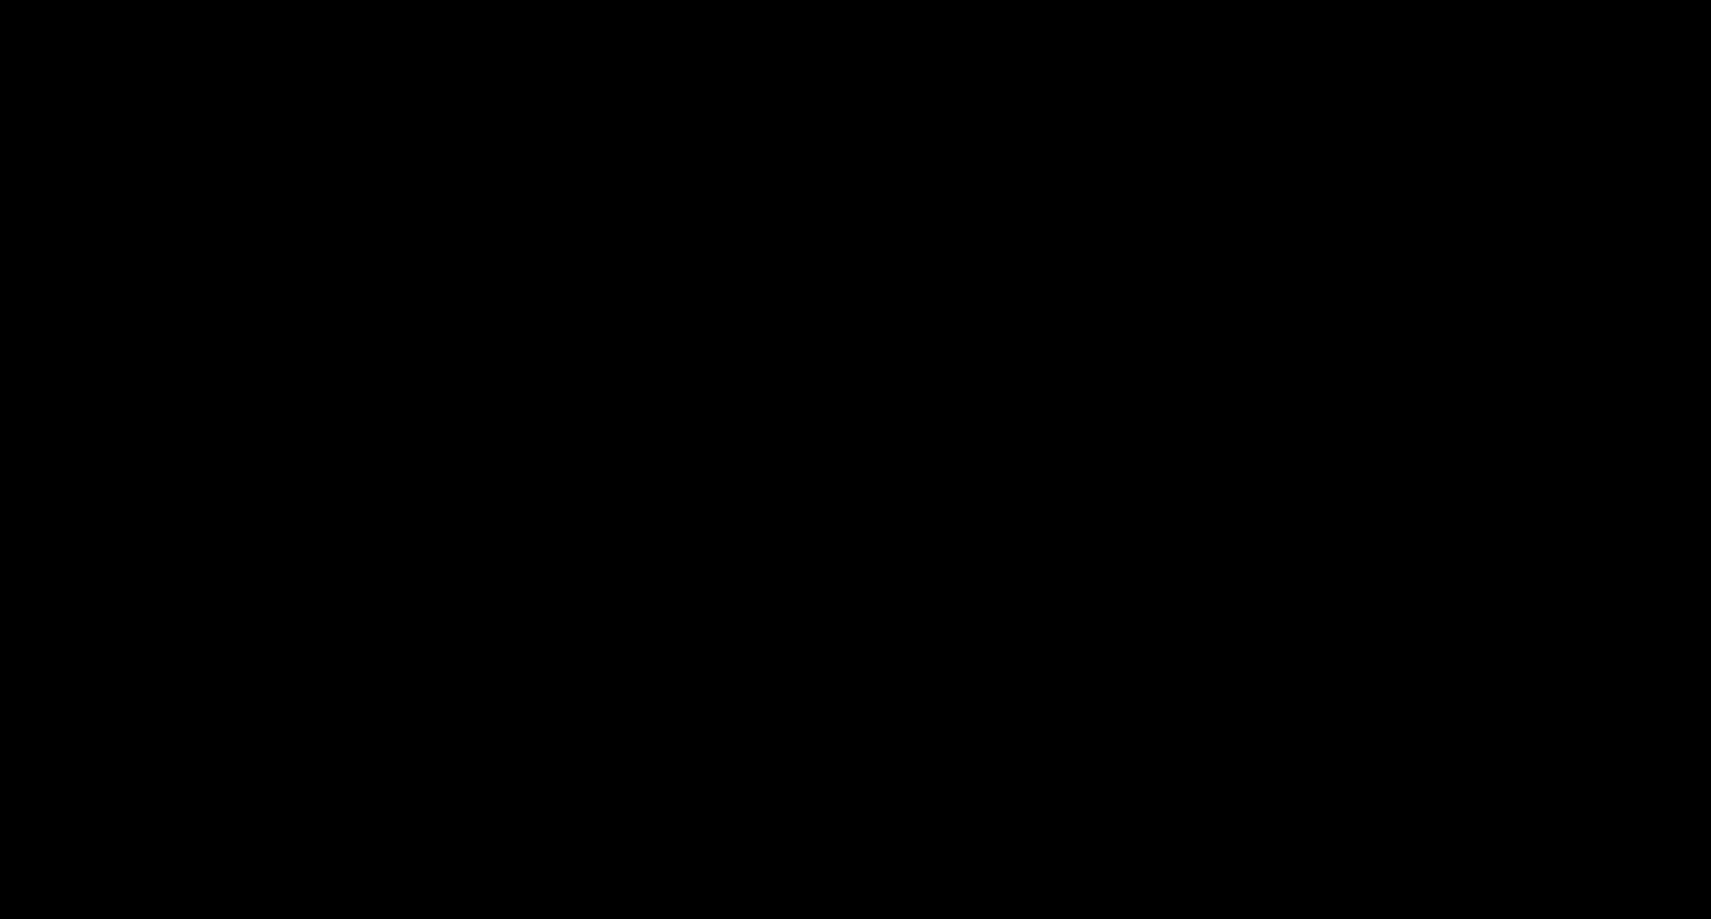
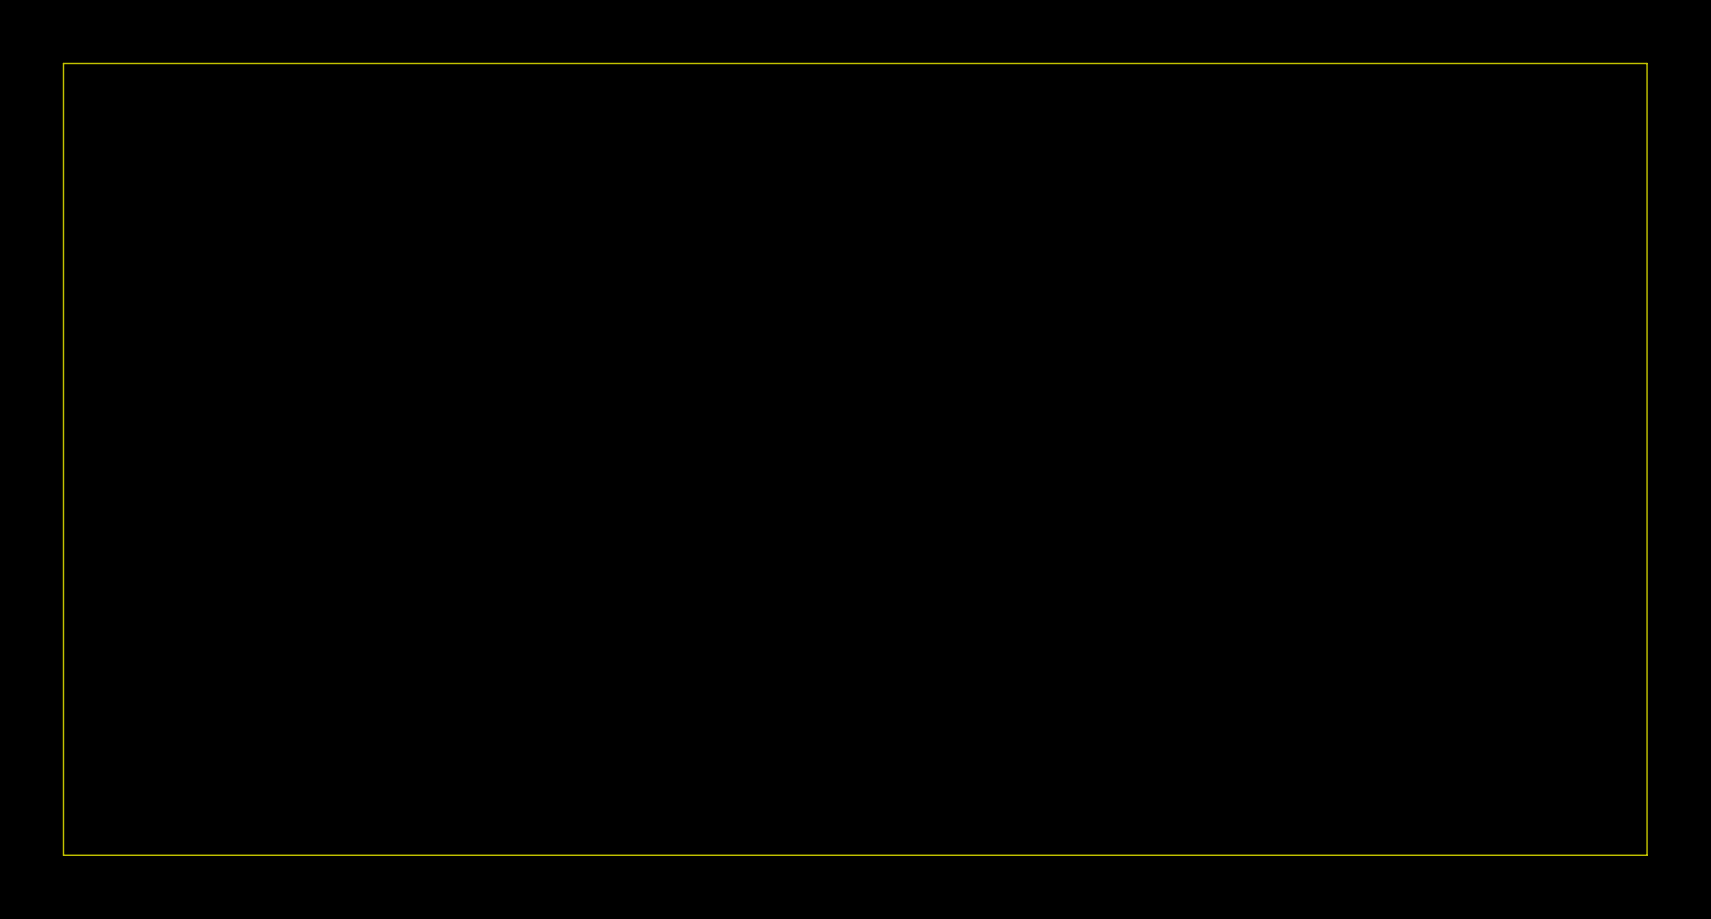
board edge: none -> (63, 63) (1647, 63) (1647, 855) (63, 855) (63, 63)

